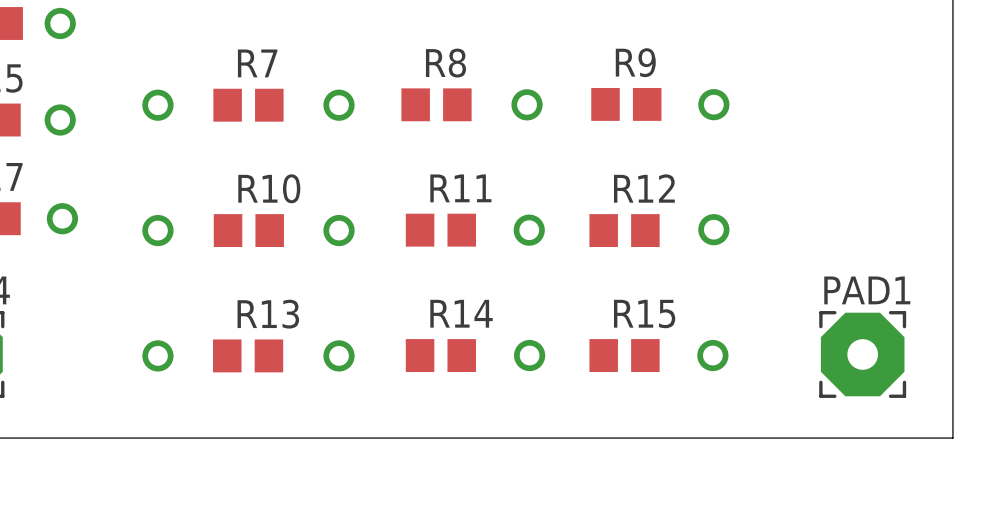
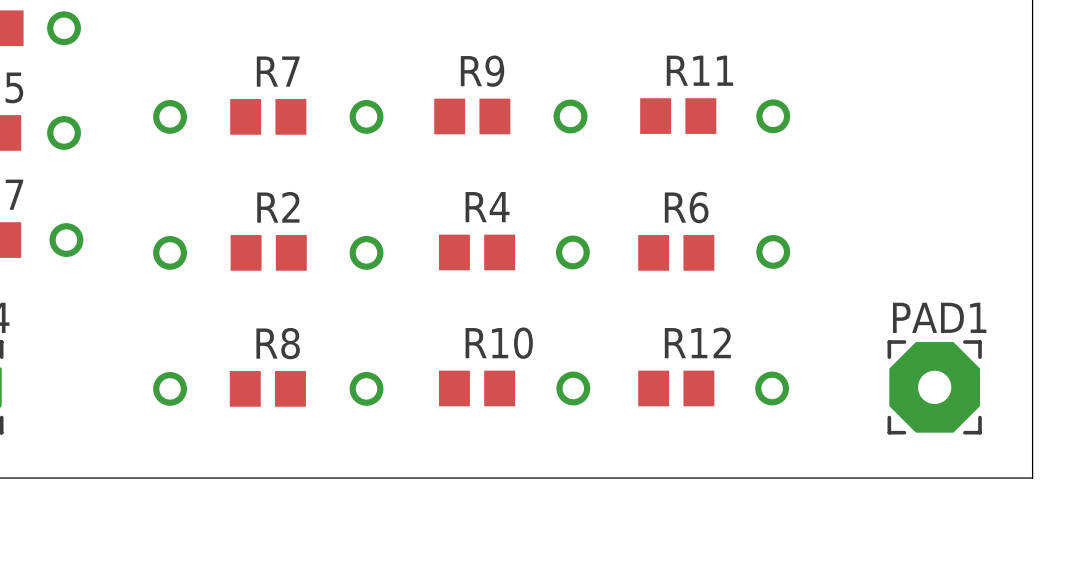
R9 name: R9 (635, 62) -> R11 (699, 70)
R8 name: R8 (445, 63) -> R9 (482, 71)
R10 name: R10 (269, 188) -> R2 (278, 207)
R11 name: R11 (460, 188) -> R4 (487, 207)
R12 name: R12 (644, 188) -> R6 (686, 207)
R14 name: R14 (461, 313) -> R10 (499, 343)
R13 name: R13 (268, 314) -> R8 (278, 343)
R15 name: R15 (644, 314) -> R12 (697, 342)

